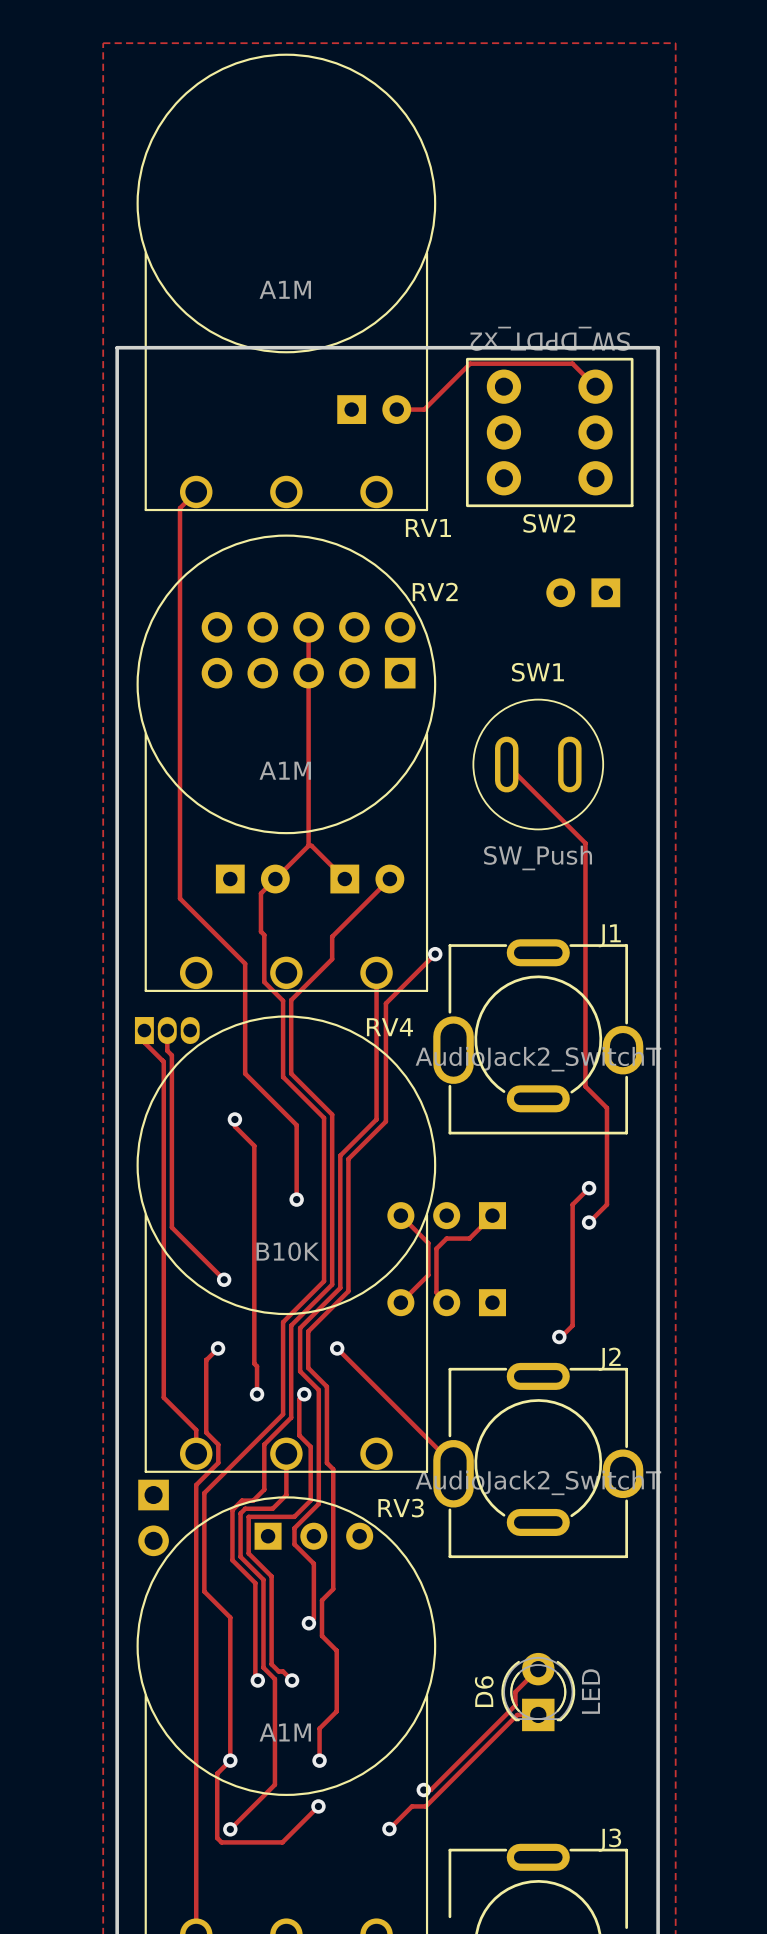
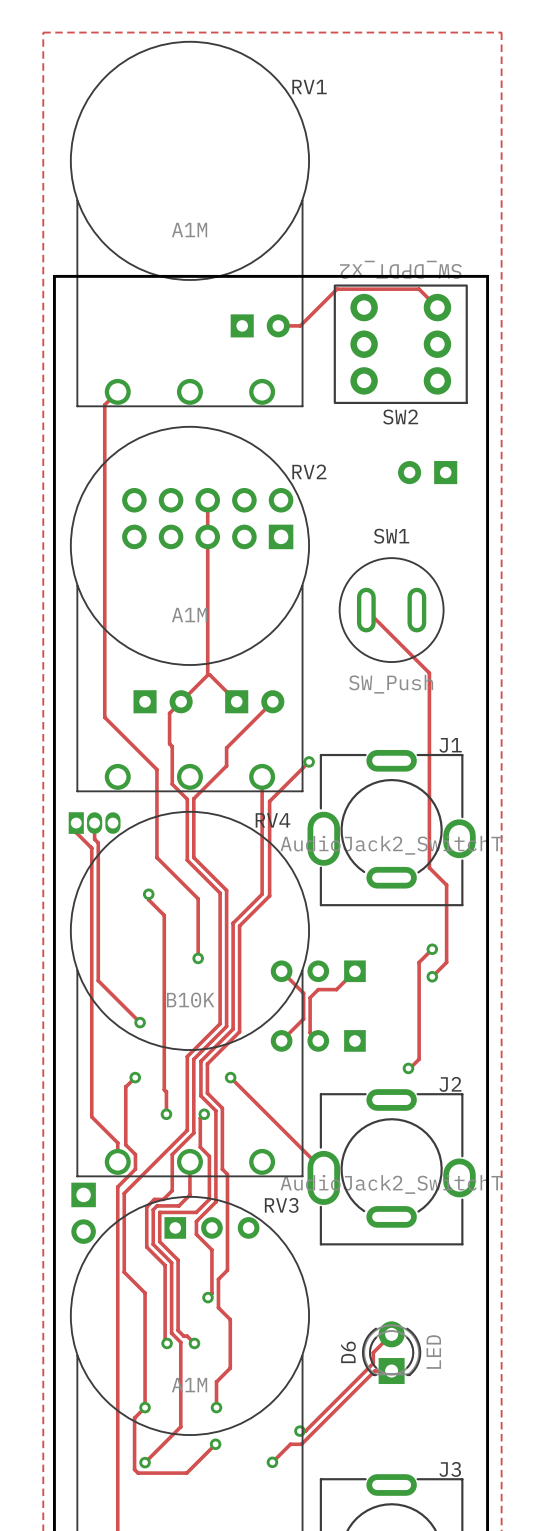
RV1 name position: RV1 (428, 527) -> RV1 (309, 87)

